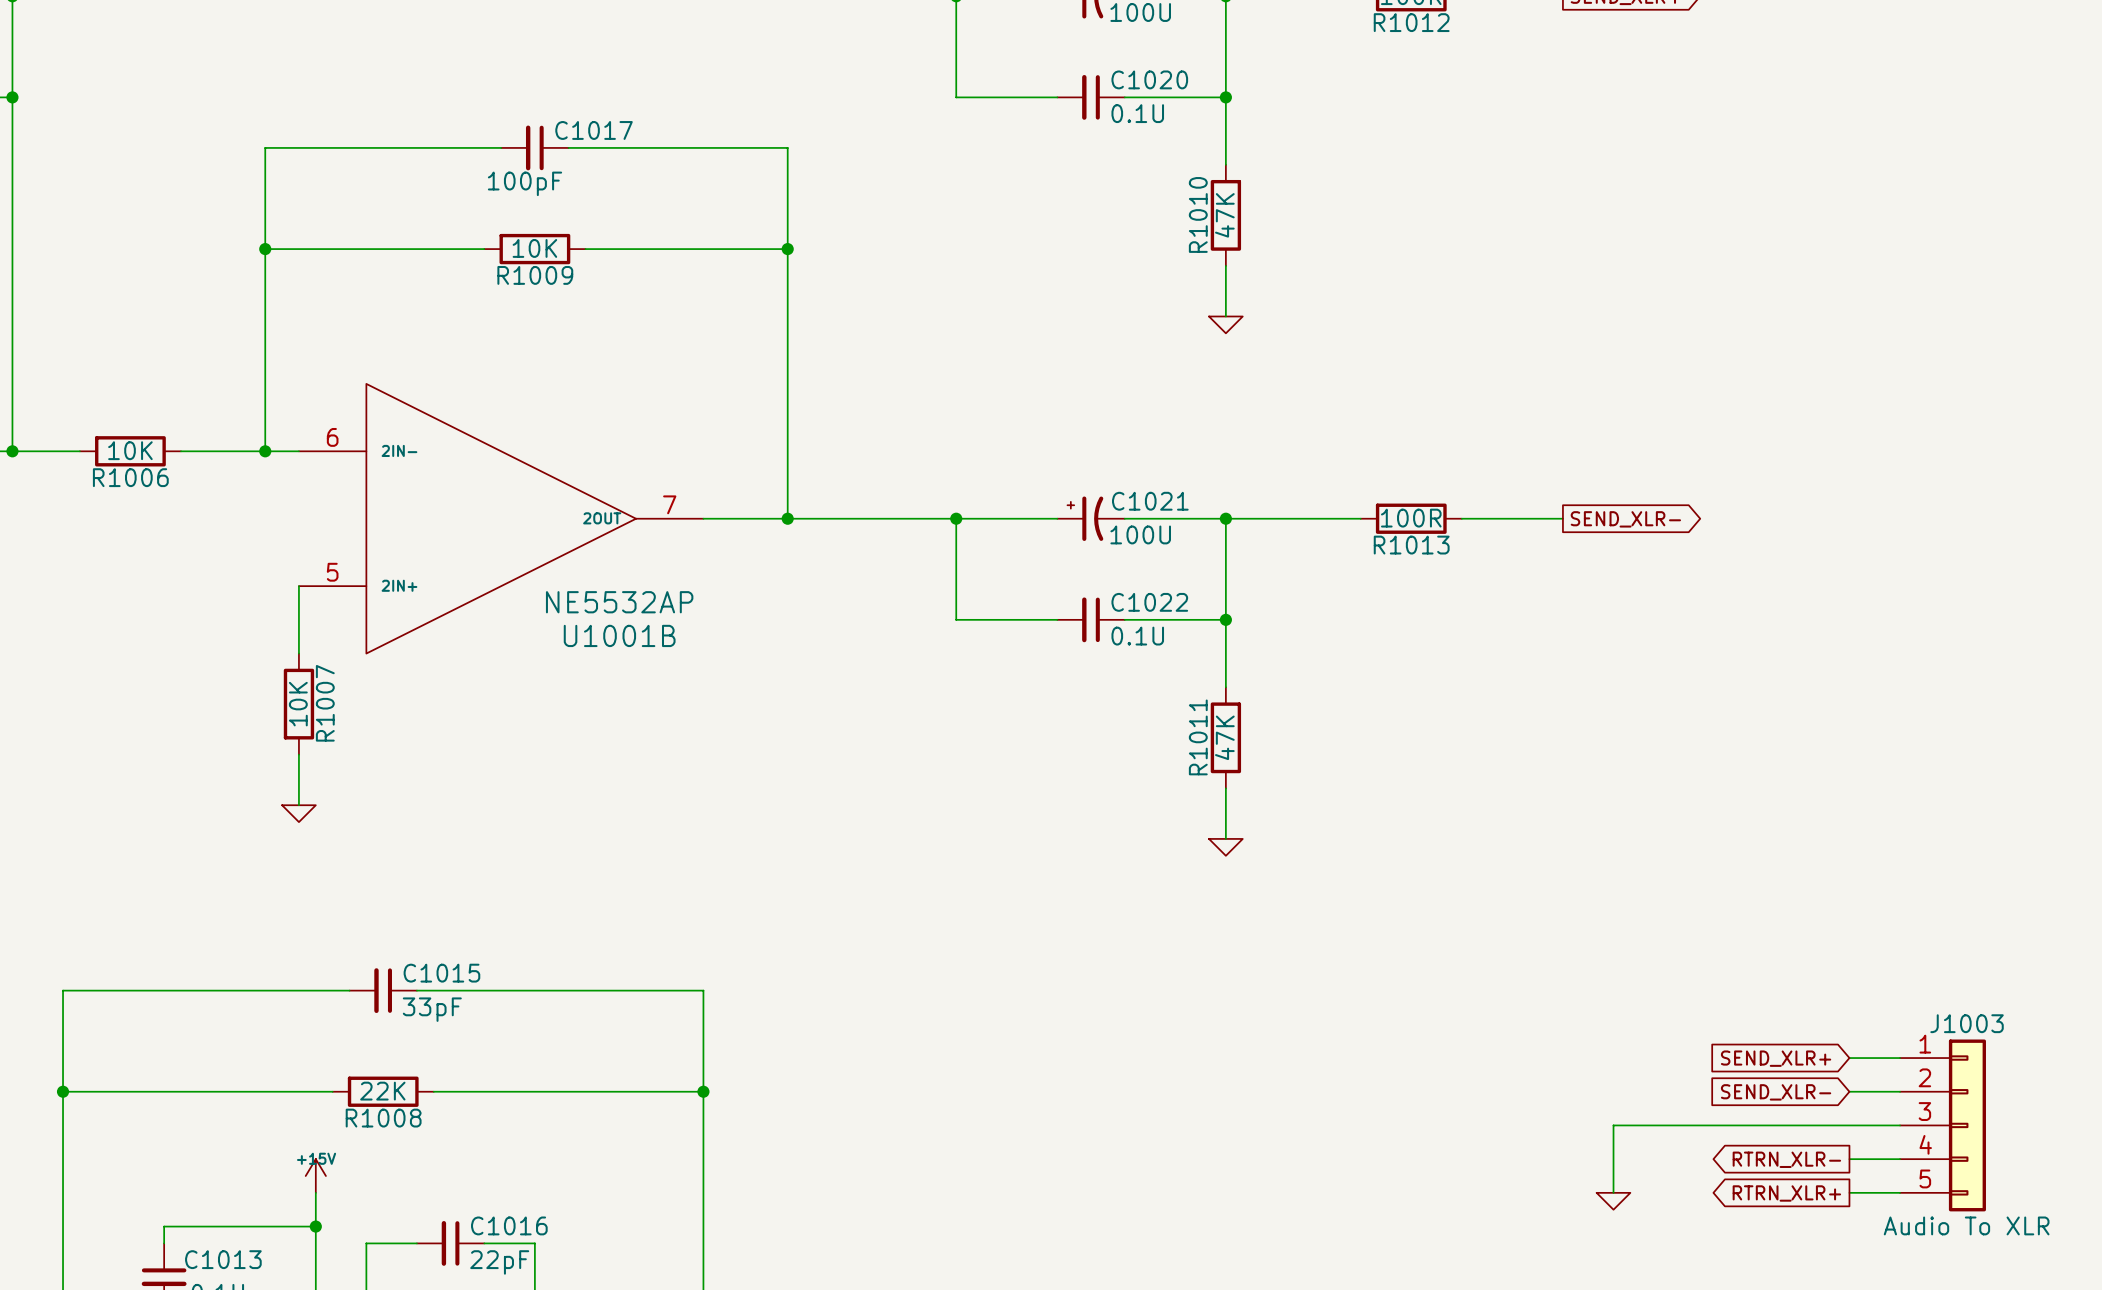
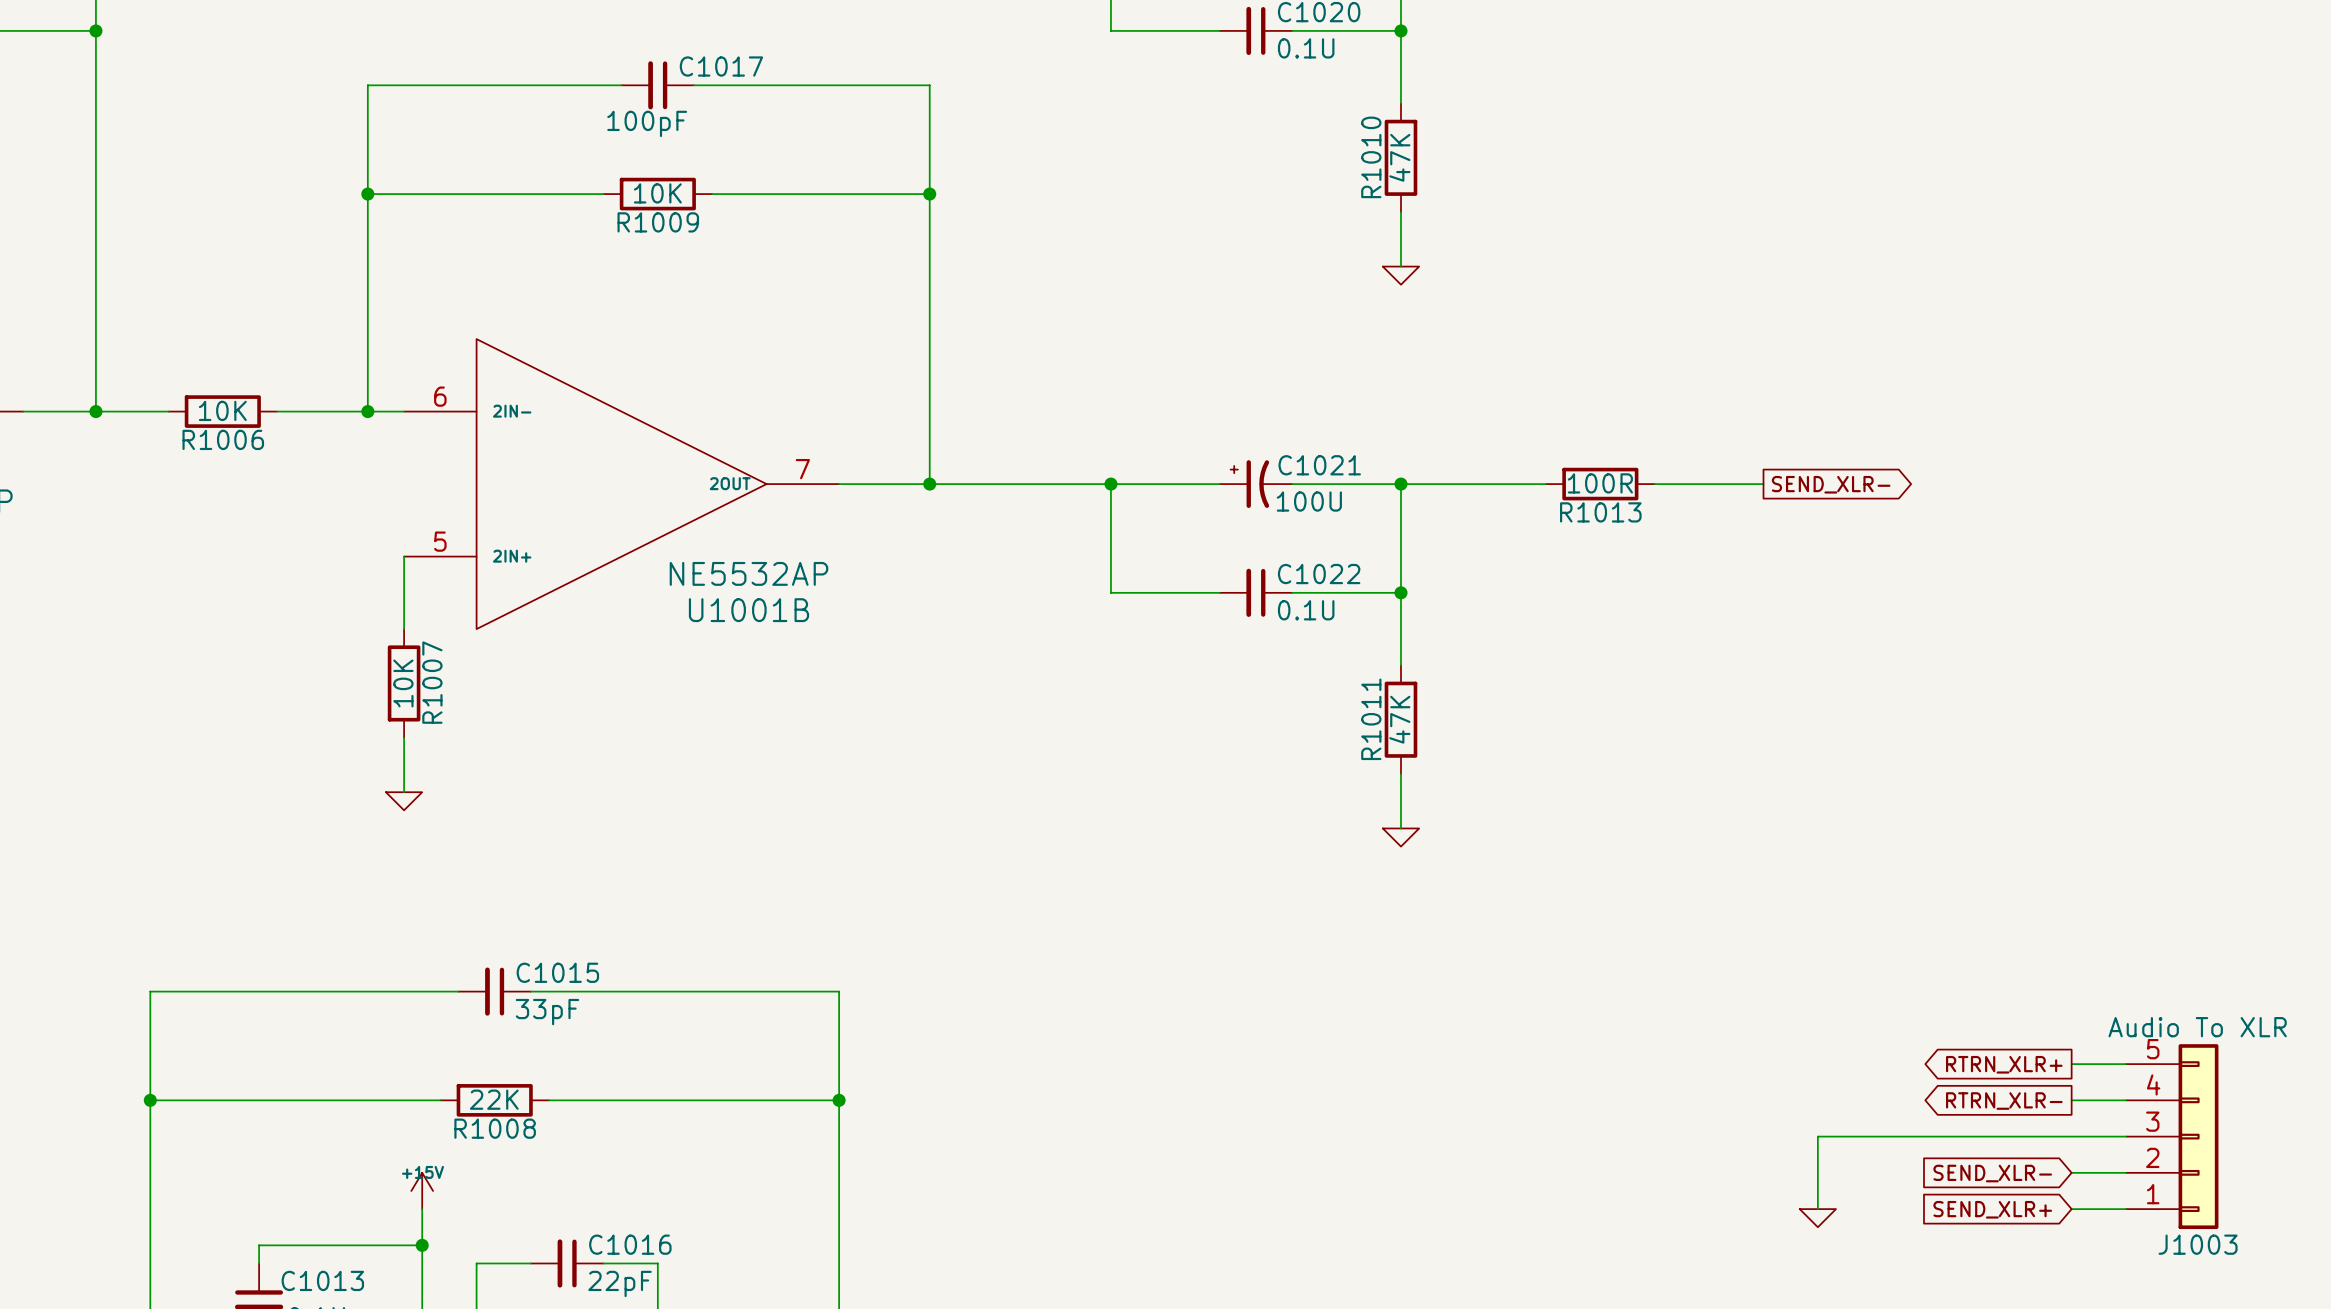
global label shape: input (1776, 1058) -> output (2004, 1064)
global label: SEND_XLR+ (1776, 1058) -> RTRN_XLR+ (2004, 1064)
global label shape: input (1776, 1092) -> output (2004, 1101)
global label: SEND_XLR- (1776, 1092) -> RTRN_XLR- (2004, 1101)
J1003 flip: as is (1967, 1125) -> up-down (2198, 1136)
global label shape: output (1786, 1159) -> input (1992, 1173)
global label: RTRN_XLR- (1786, 1159) -> SEND_XLR- (1992, 1173)
global label shape: output (1786, 1193) -> input (1992, 1209)
global label: RTRN_XLR+ (1786, 1193) -> SEND_XLR+ (1992, 1209)

